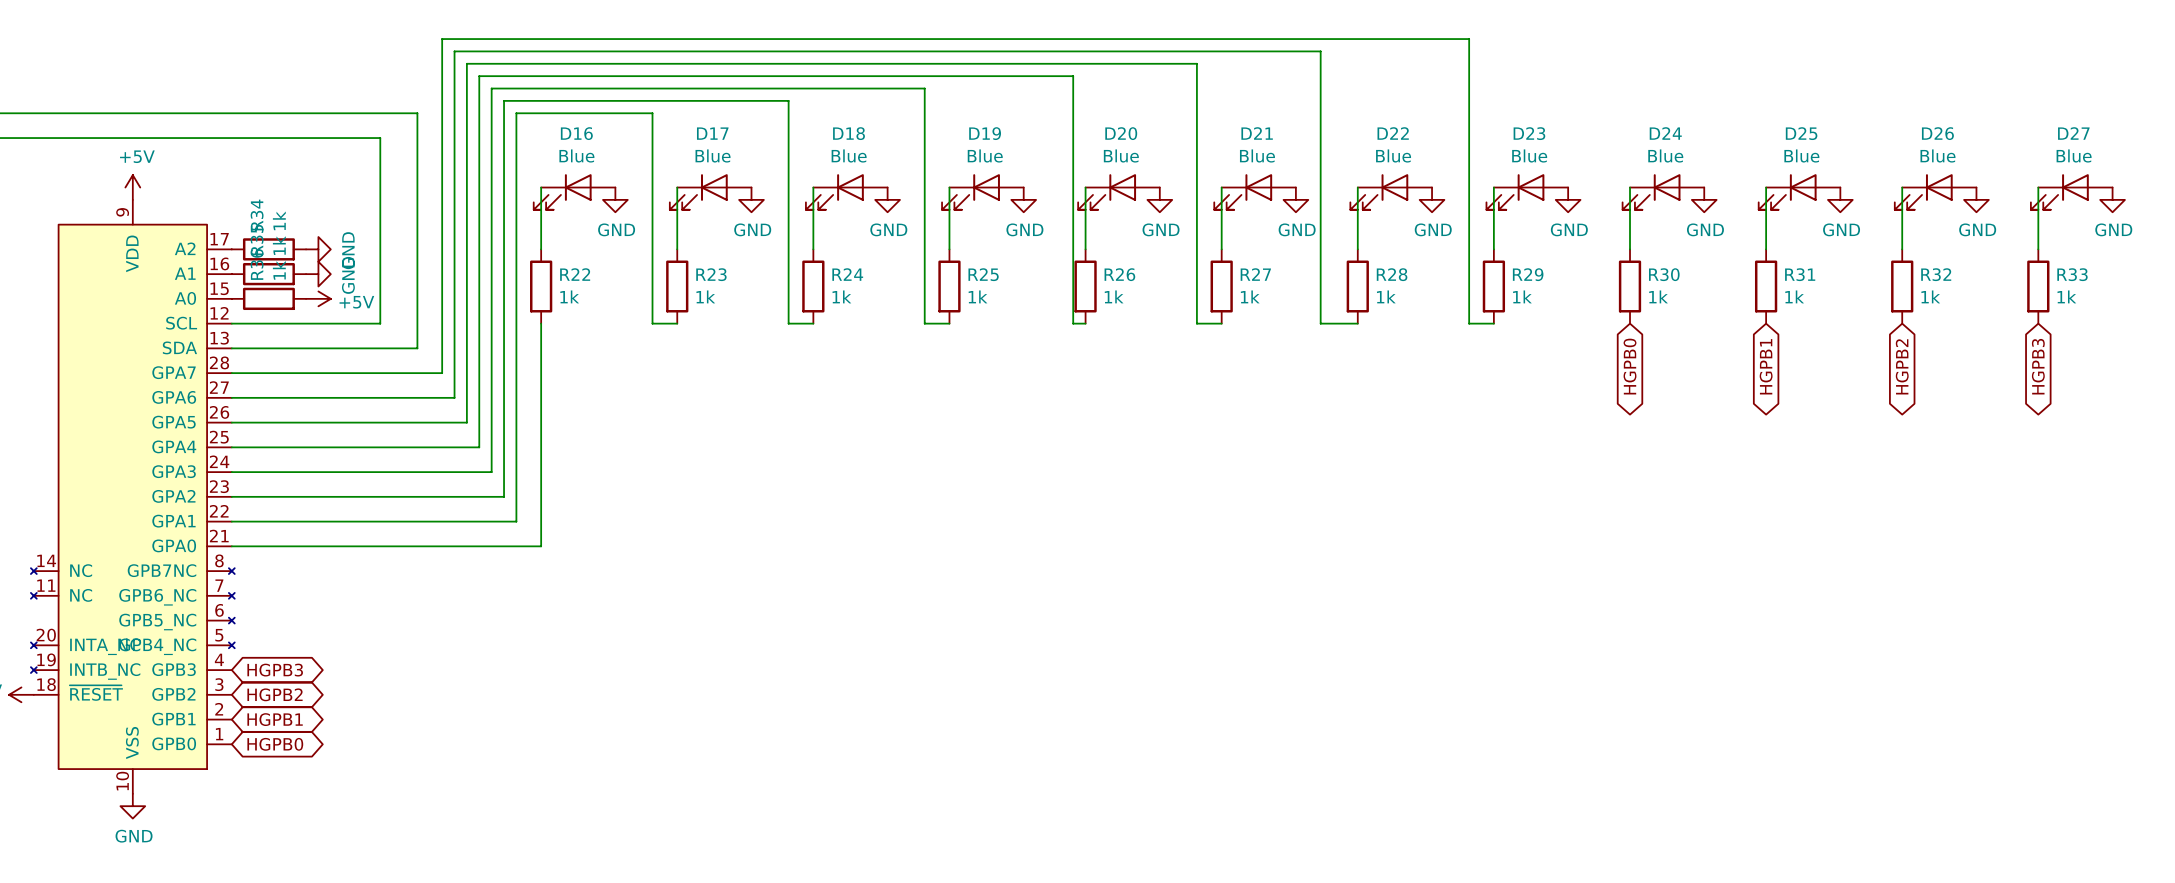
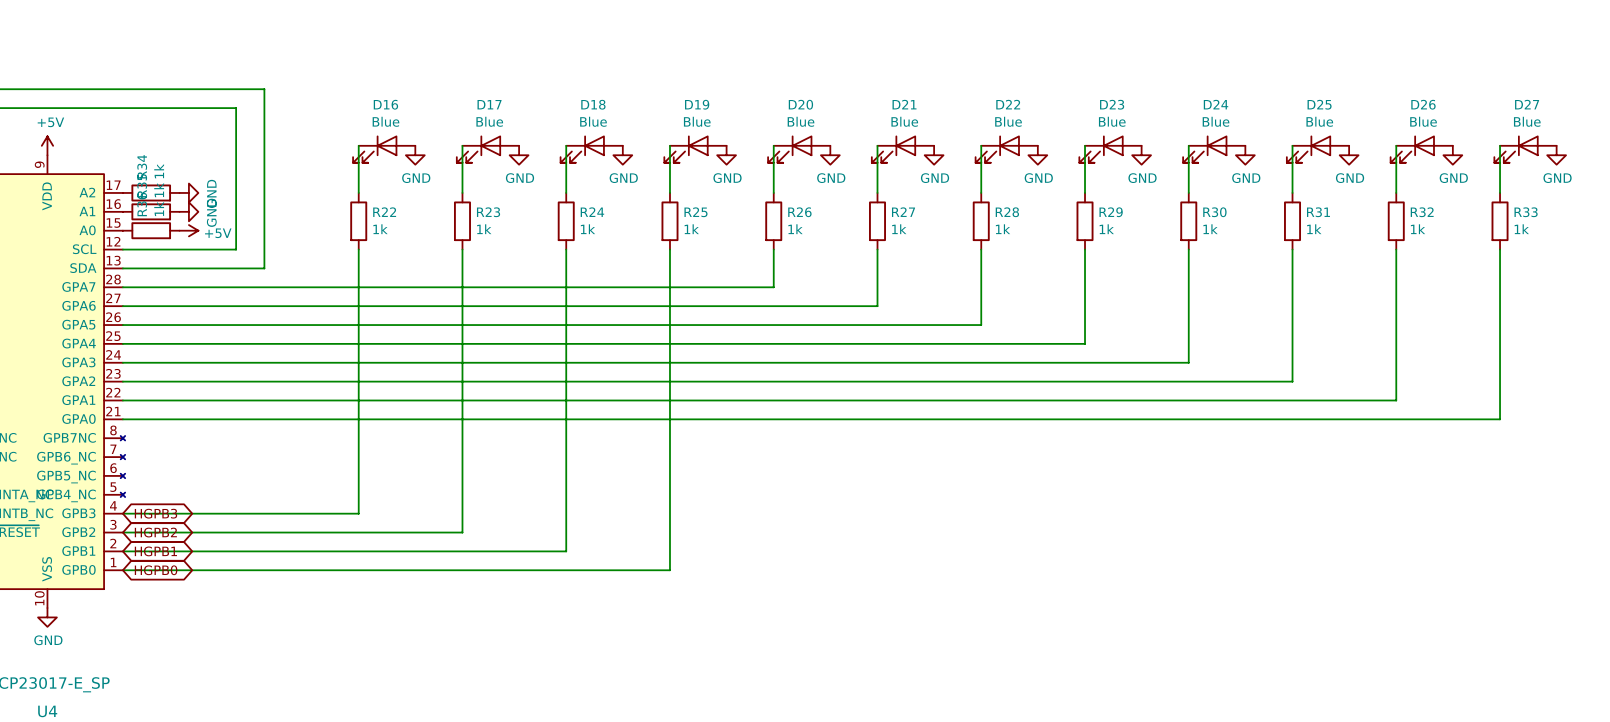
wire: (677, 323) (652, 323) (652, 113) (516, 113) (516, 521) -> (462, 249) (462, 532) (122, 532)
wire: (813, 323) (788, 323) (788, 100) (504, 100) (504, 496) -> (566, 249) (566, 551) (122, 551)
wire: (949, 323) (924, 323) (924, 88) (491, 88) (491, 472) -> (669, 249) (669, 570) (122, 570)
wire: (1085, 323) (1073, 323) (1073, 76) (479, 76) (479, 447) -> (773, 249) (773, 287) (283, 287)
wire: (1221, 323) (1196, 323) (1196, 63) (466, 63) (466, 422) -> (877, 249) (877, 306) (292, 306)
wire: (1357, 323) (1320, 323) (1320, 51) (454, 51) (454, 397) -> (981, 249) (981, 325) (302, 325)
wire: (1493, 323) (1469, 323) (1469, 39) (442, 39) (442, 373) -> (1085, 249) (1085, 343) (311, 343)
wire: none -> (1188, 249) (1188, 362) (320, 362)
wire: none -> (1292, 249) (1292, 381) (330, 381)
wire: none -> (1396, 249) (1396, 400) (339, 400)
wire: none -> (1500, 249) (1500, 419) (358, 419) (358, 513) (122, 513)
global label: HGPB0 (1630, 366) -> none
global label: HGPB1 (1766, 366) -> none
global label: HGPB2 (1902, 366) -> none
global label: HGPB3 (2038, 366) -> none

